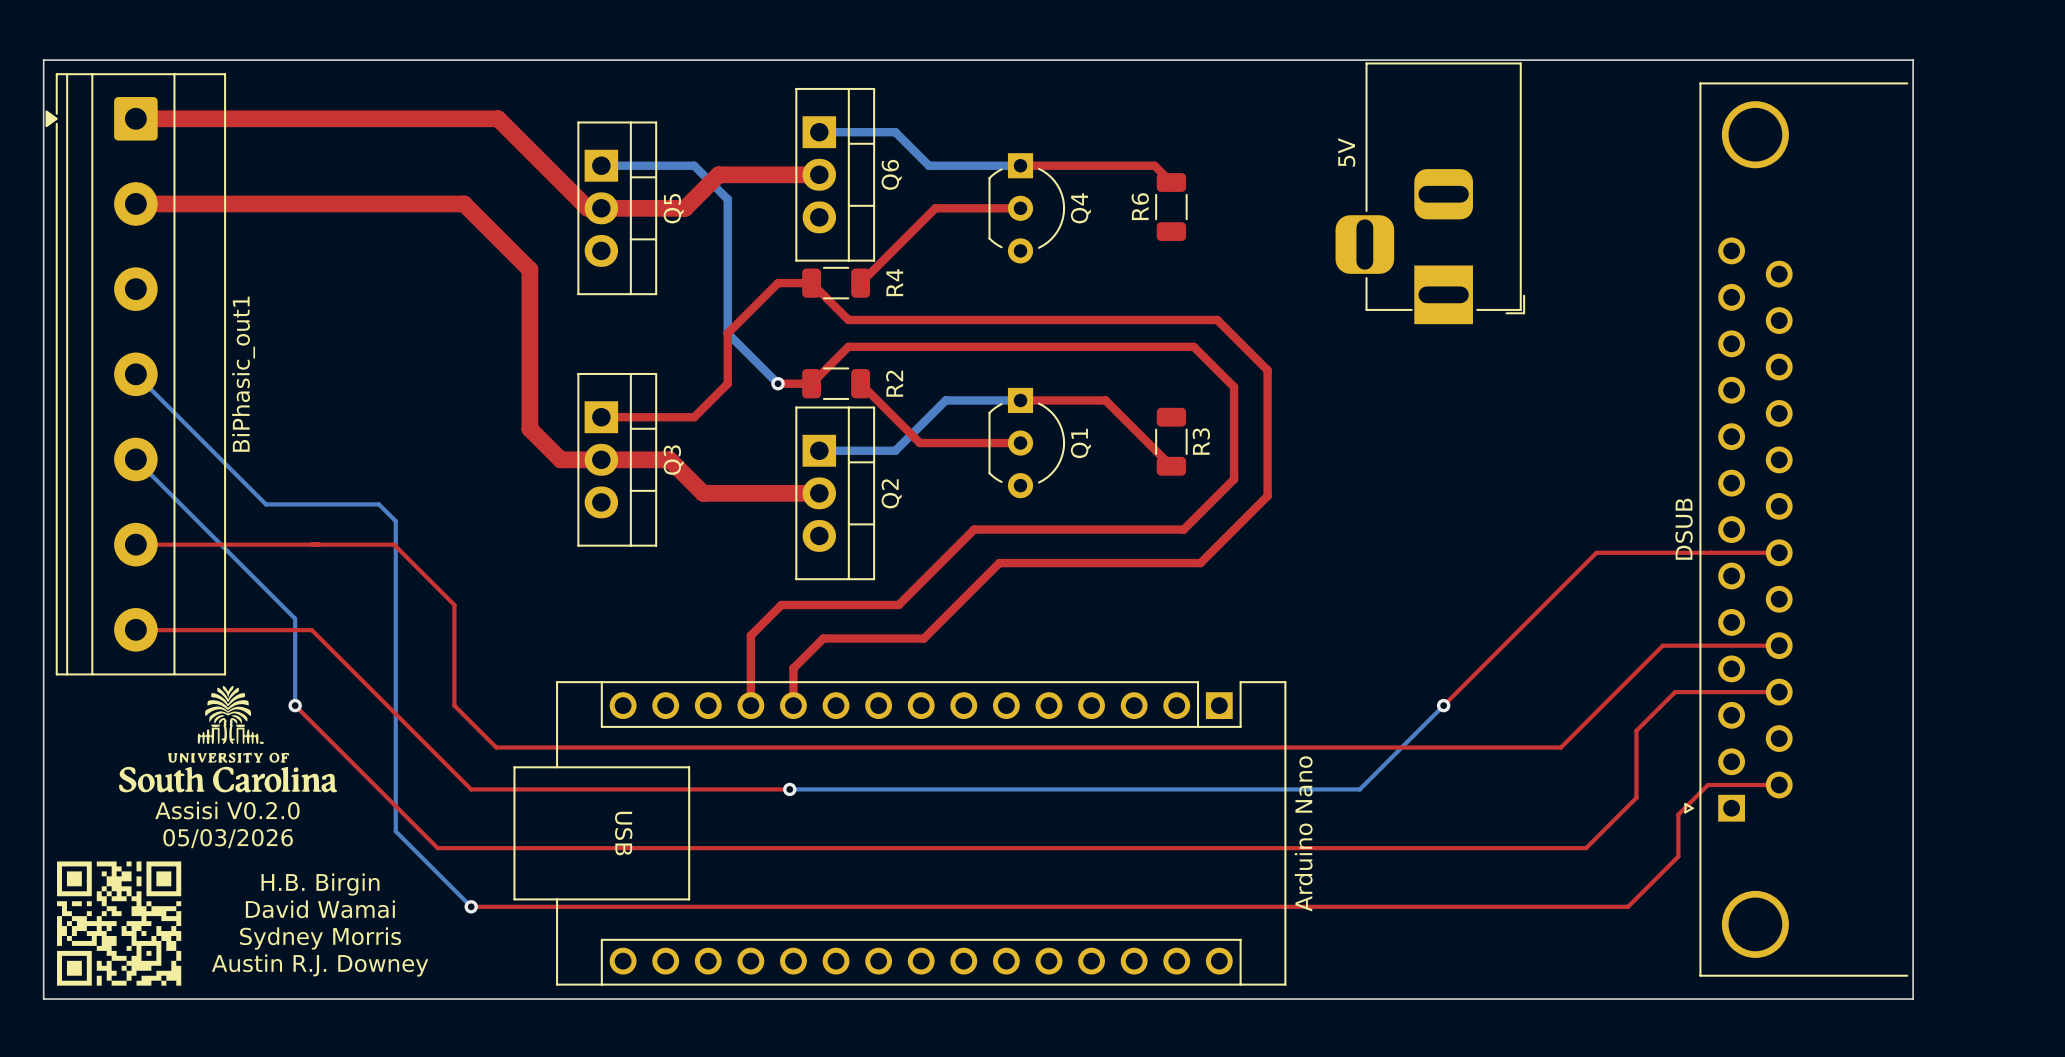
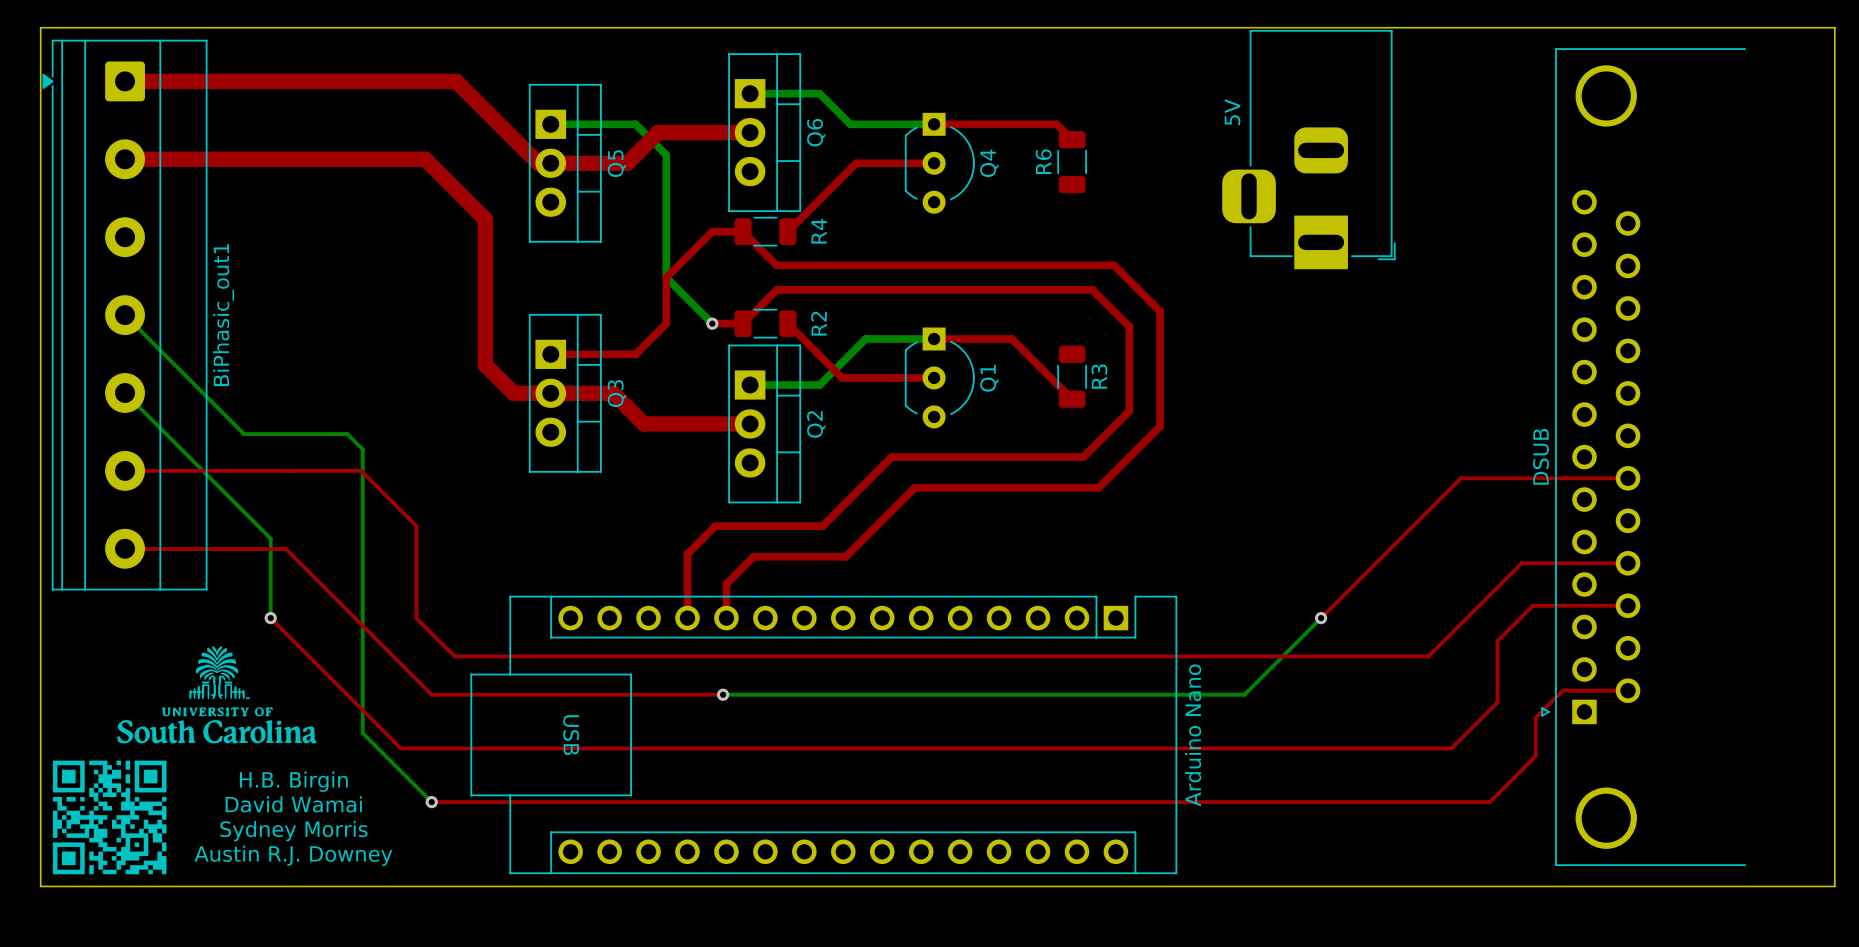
board edge: (1913, 60) (1913, 999) -> (1750, 27) (1834, 27) (1834, 886) (1750, 886)
drawing position: (228, 739) -> (216, 694)
text: Assisi V0.2.0 (227, 810) -> none
text: 05/03/2026 (228, 838) -> none

